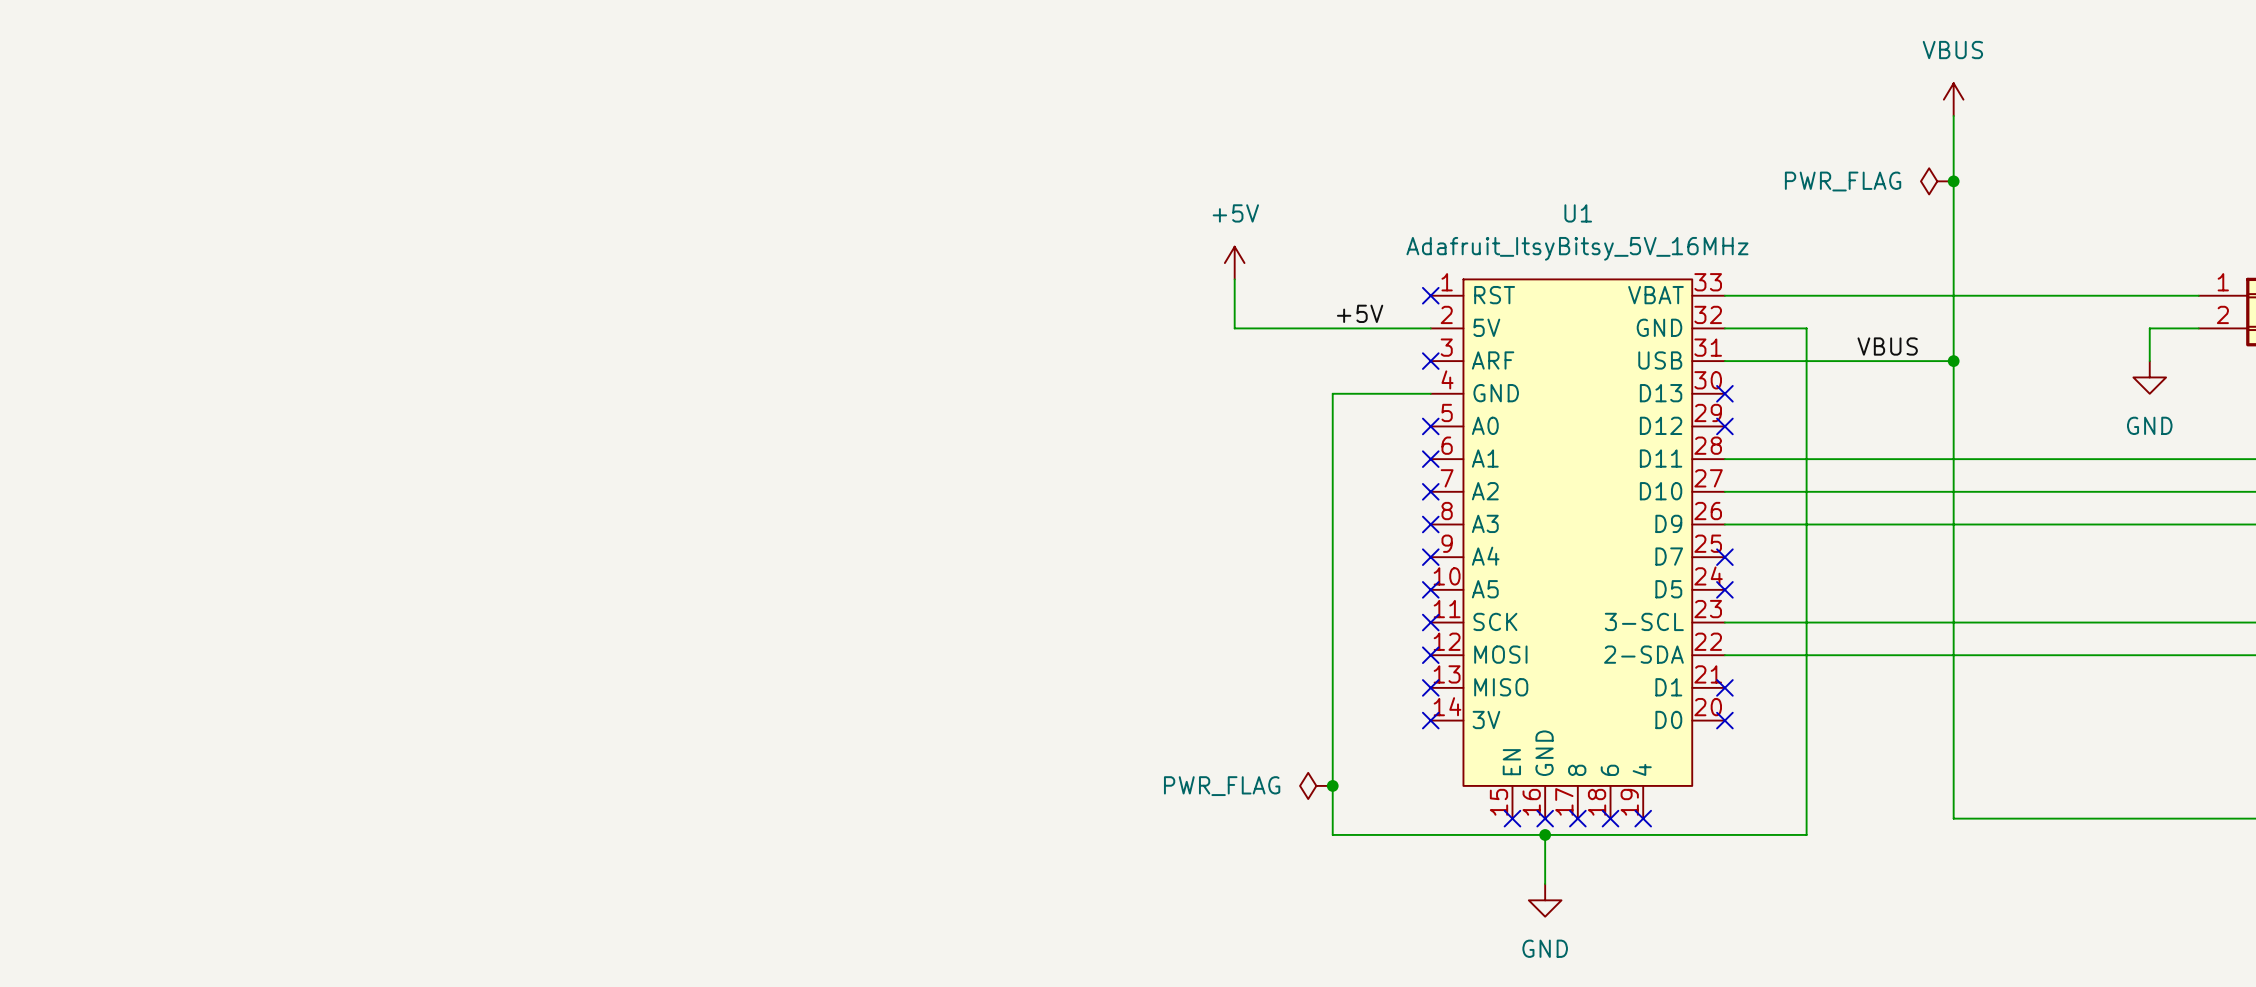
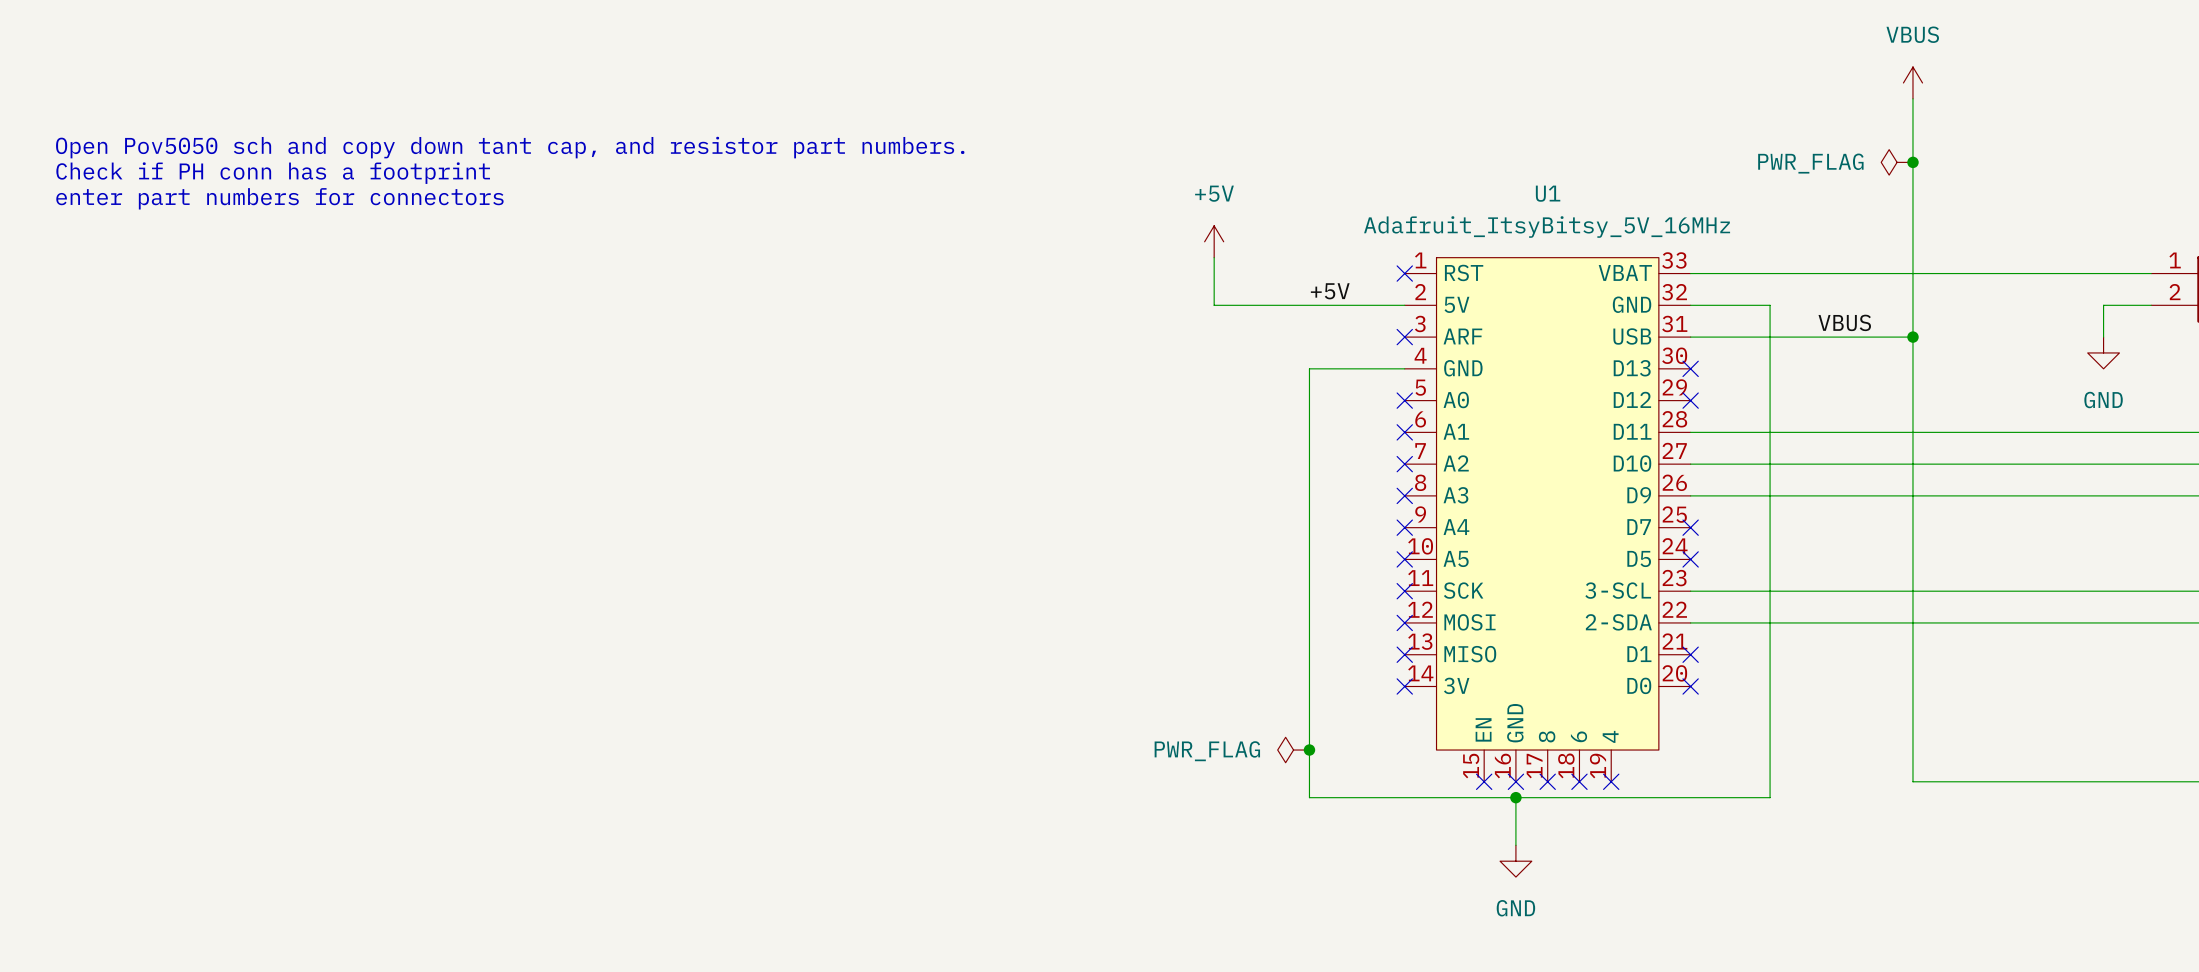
text: none -> Open Pov5050 sch and copy down tant cap, and resistor part numbers. (510, 147)
text: none -> Check if PH conn has a footprint (273, 173)
text: none -> enter part numbers for connectors (279, 198)

